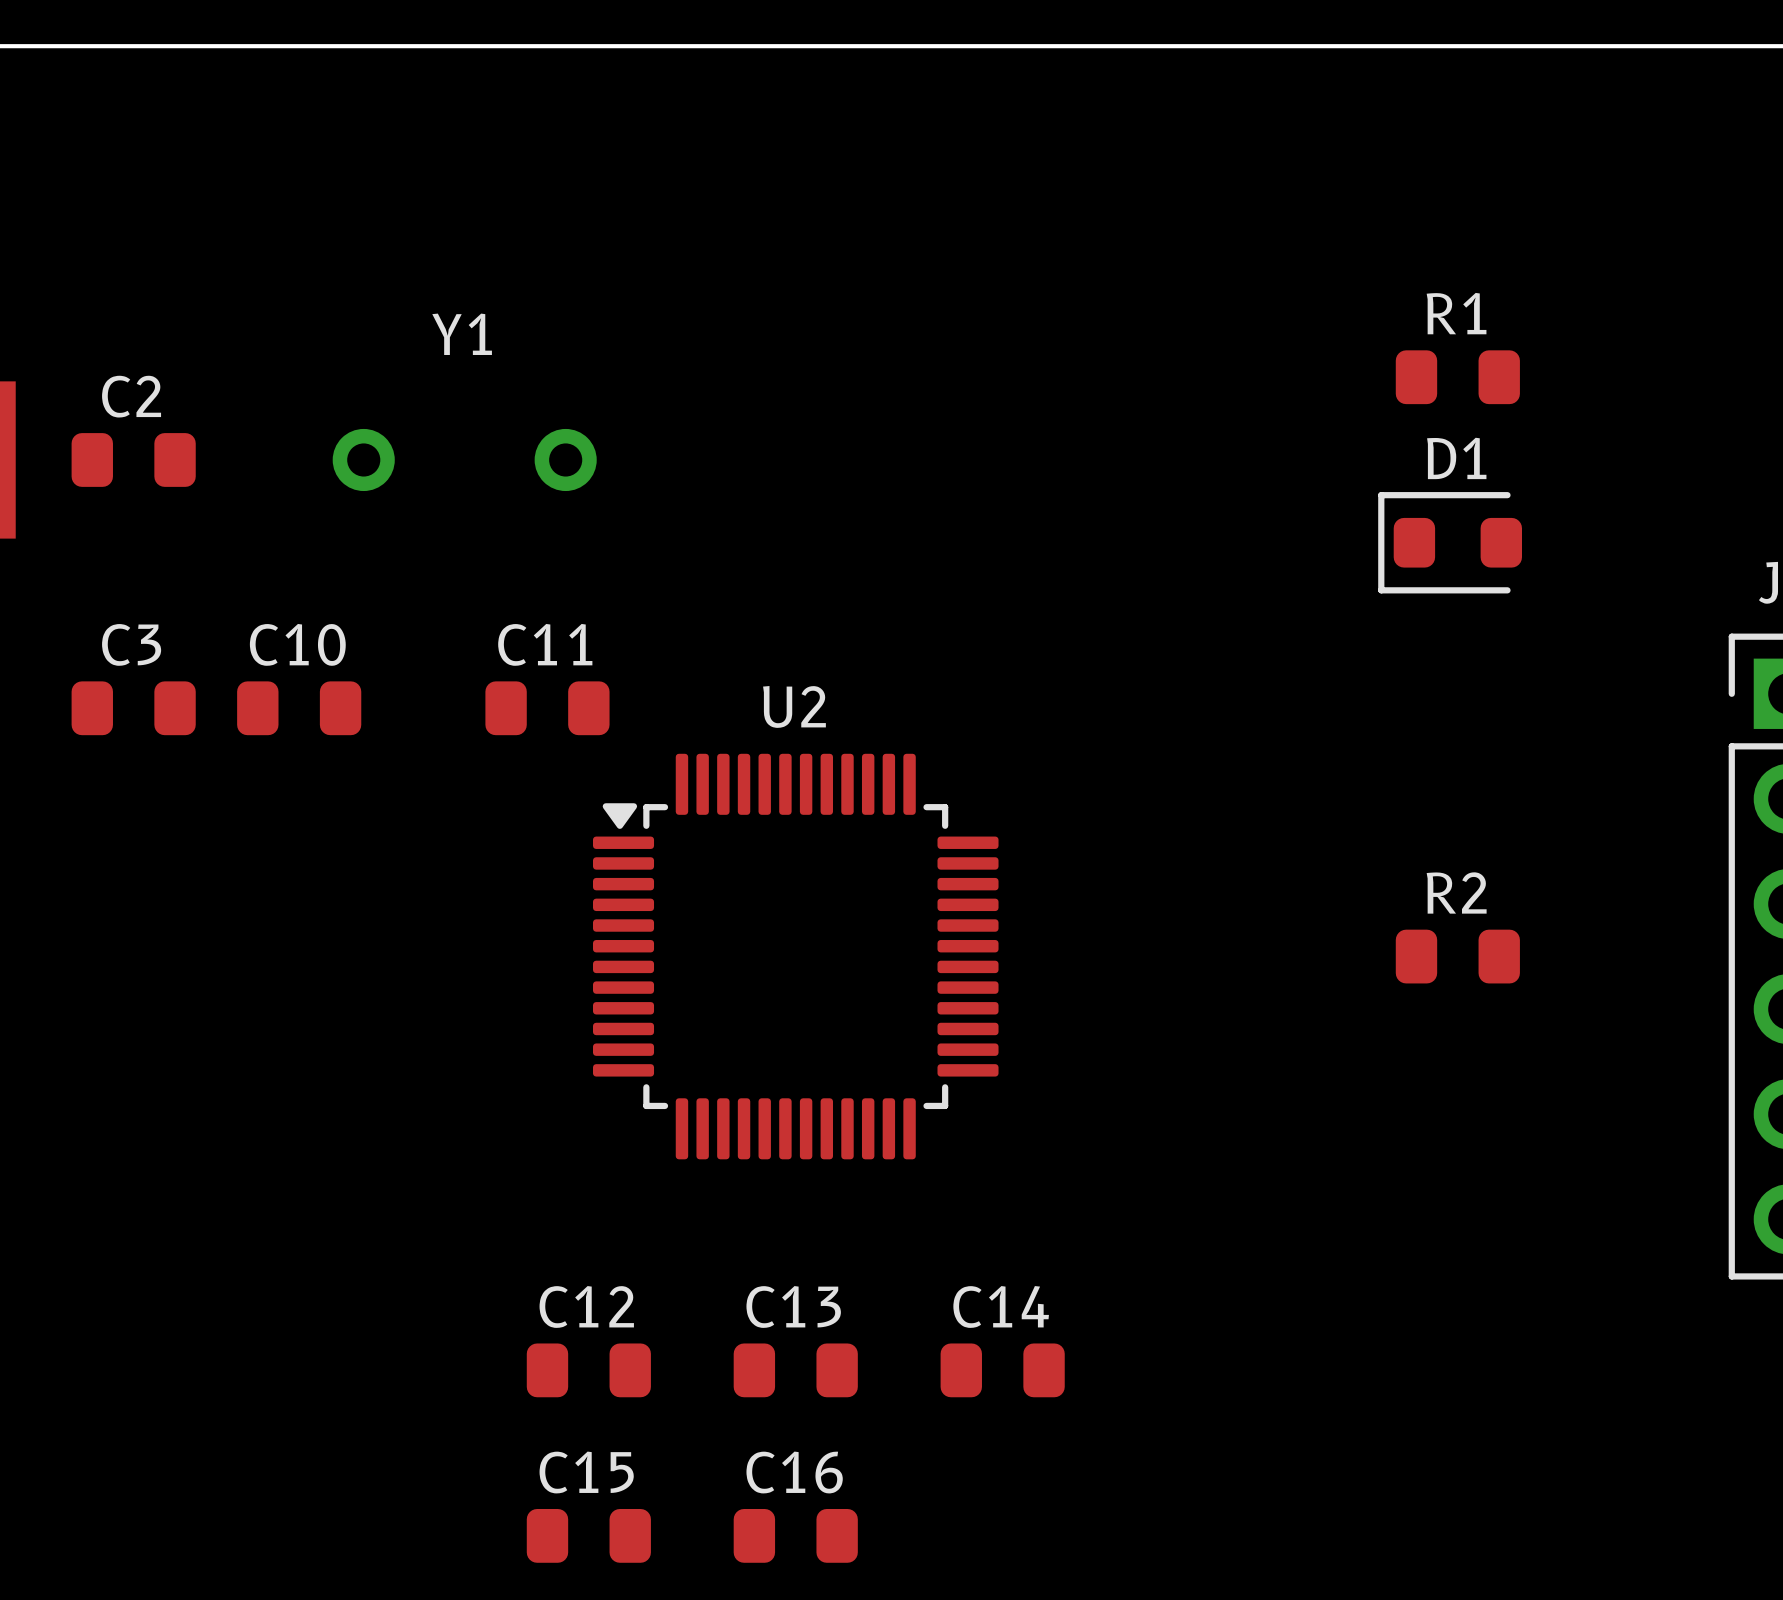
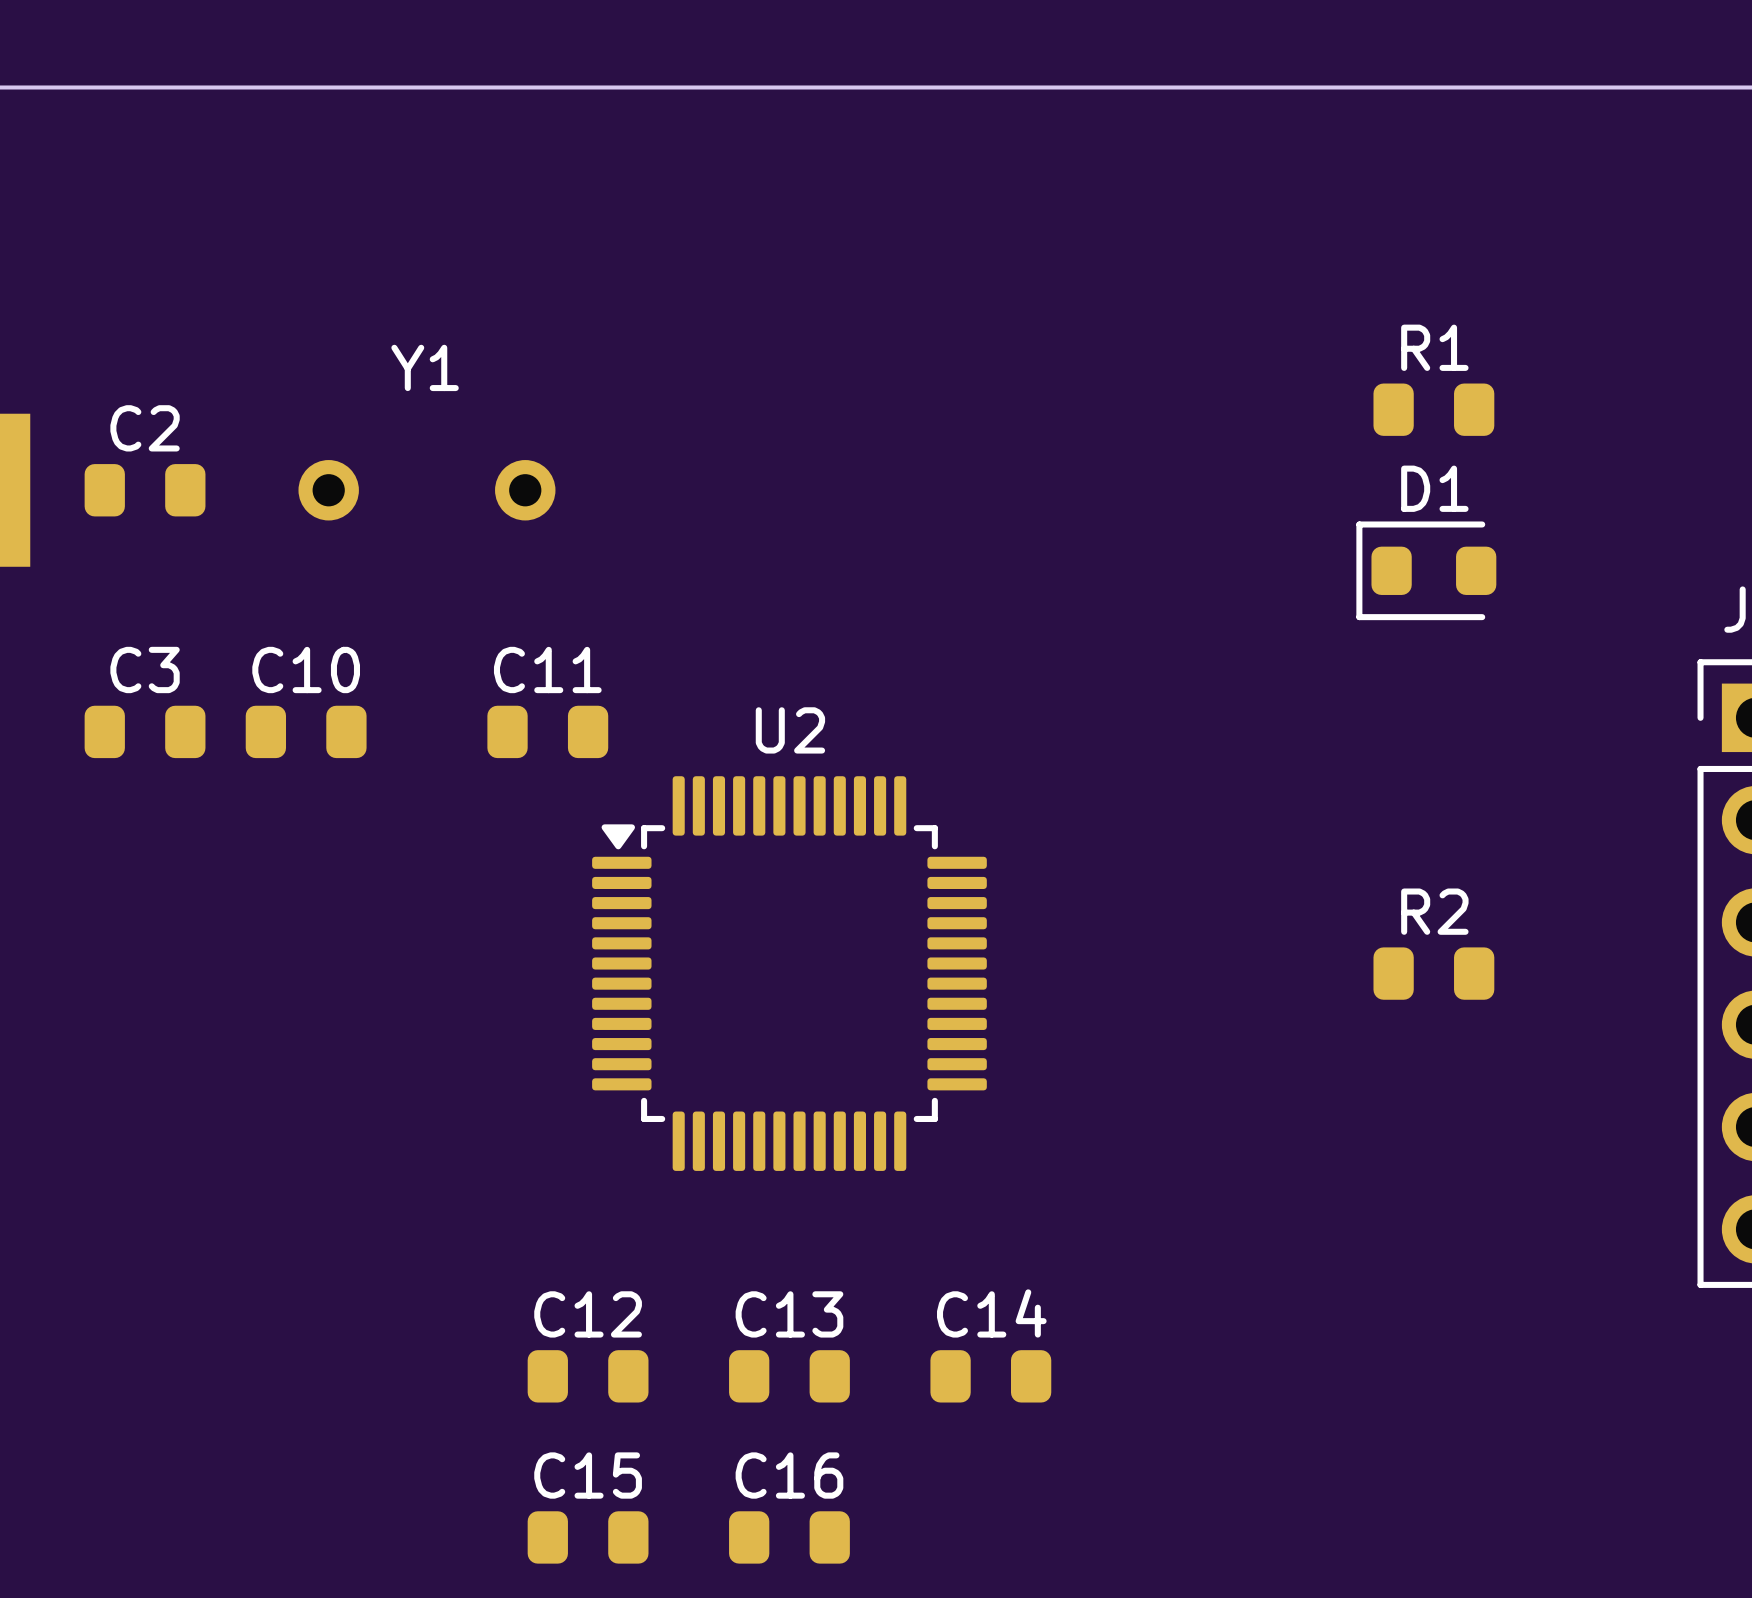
Y1 position: (464, 459) -> (426, 490)

